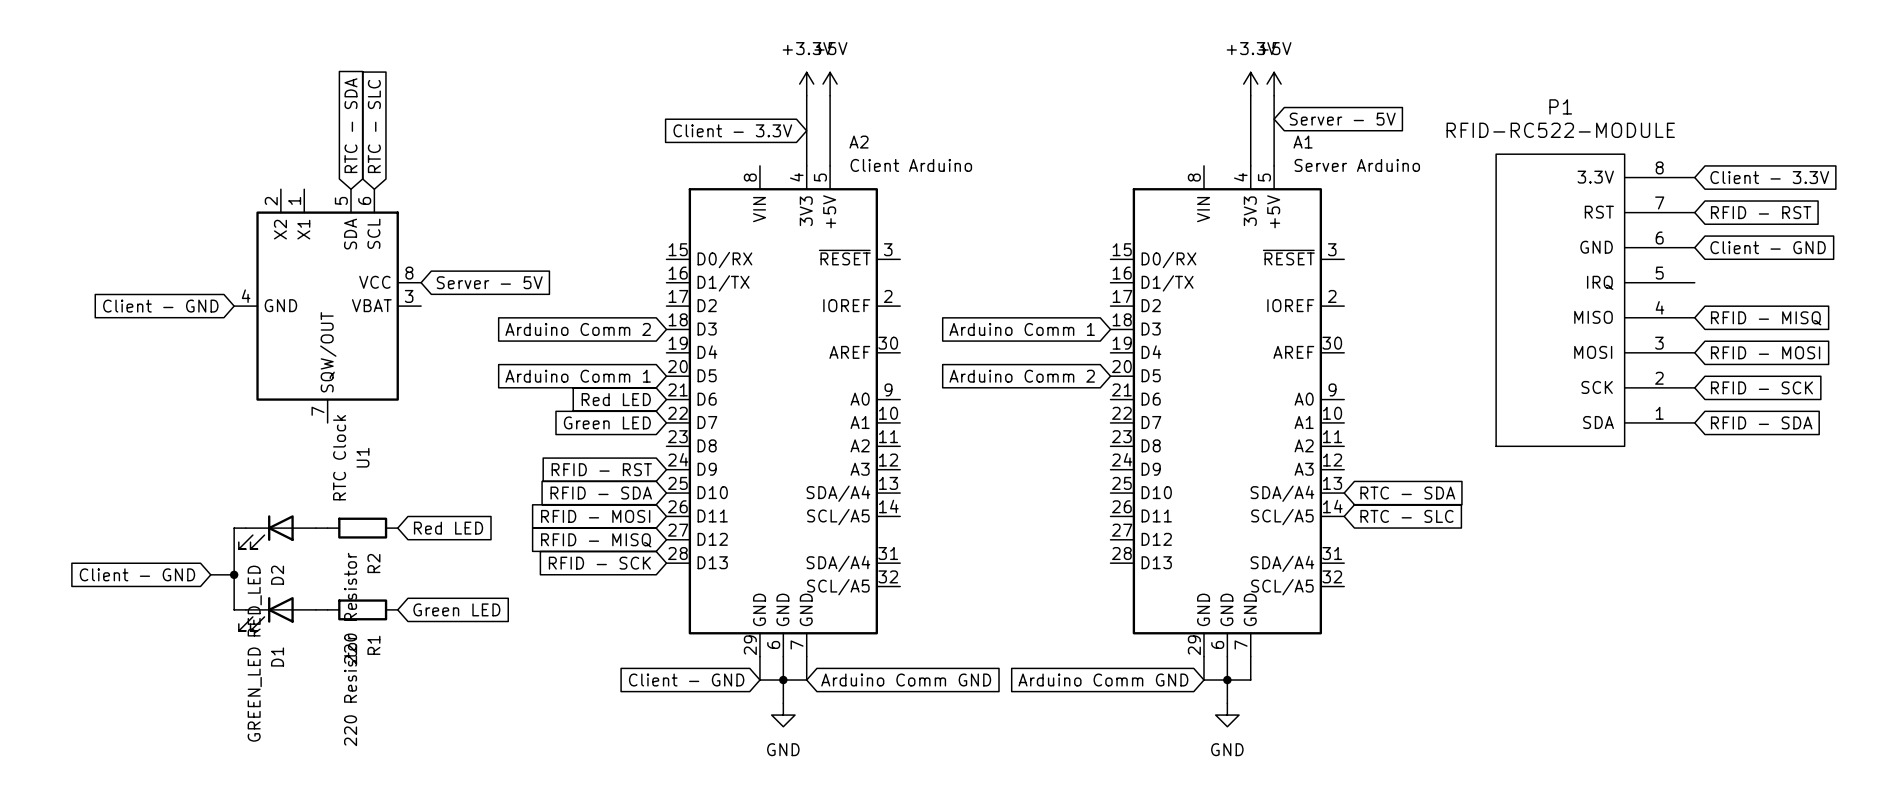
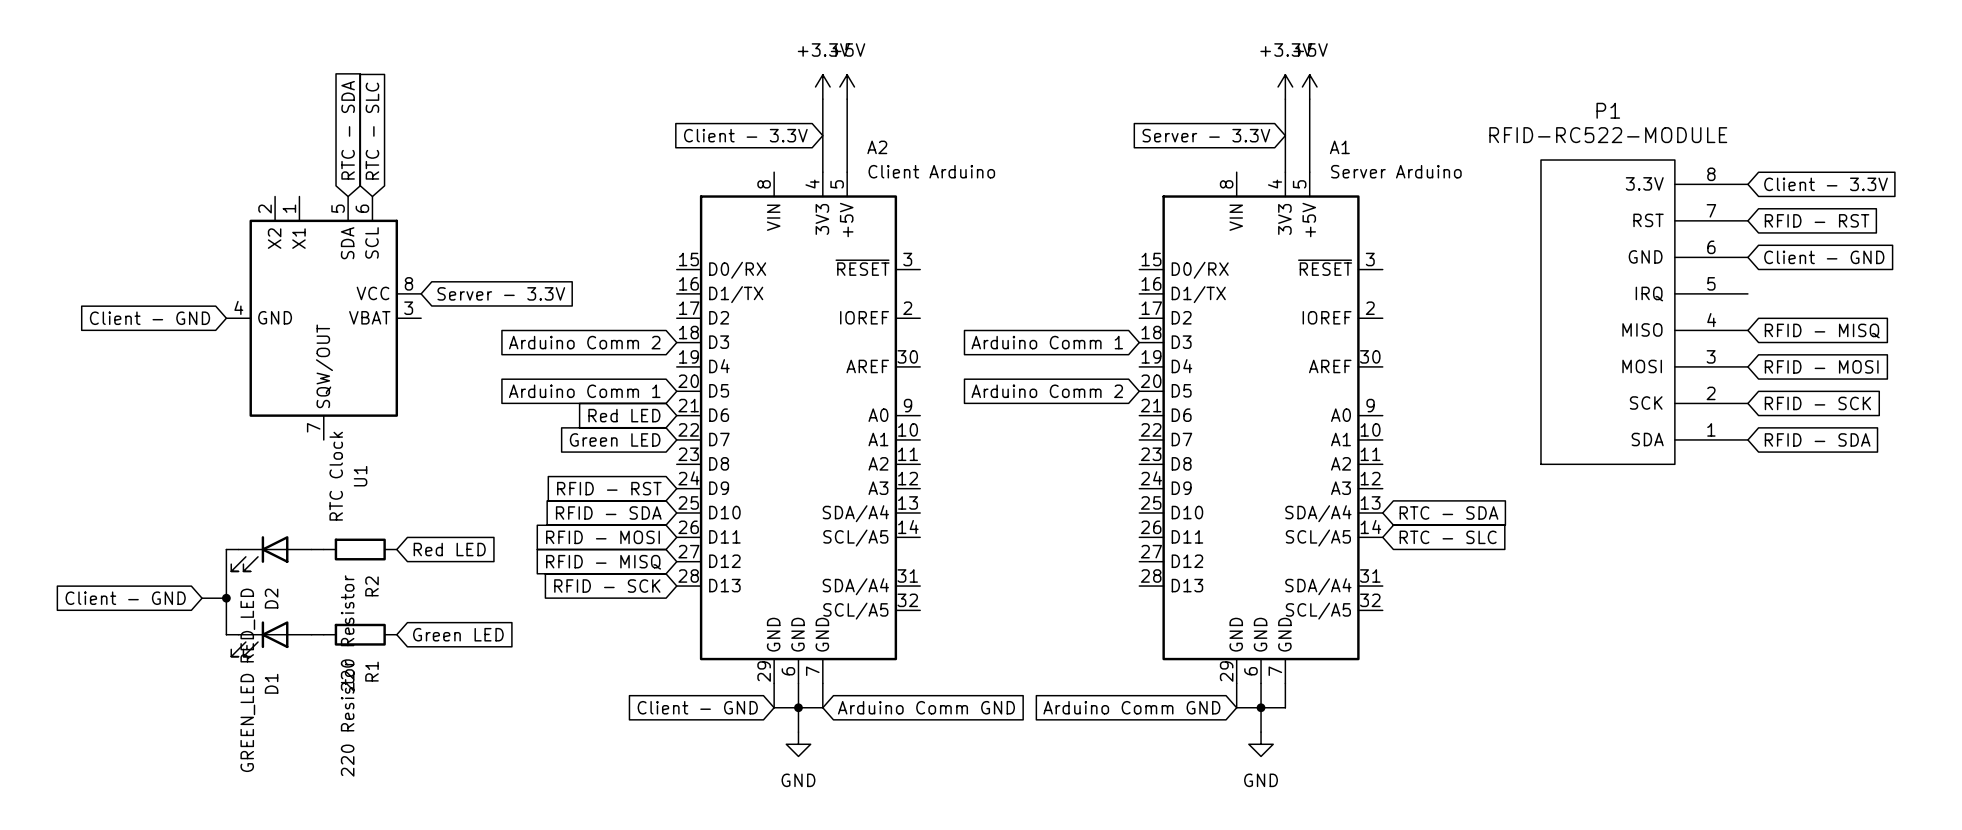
global label: Server - 5V (1342, 119) -> none
global label: none -> Server - 3.3V (1206, 135)
global label: Server - 5V (489, 282) -> Server - 3.3V (501, 293)

